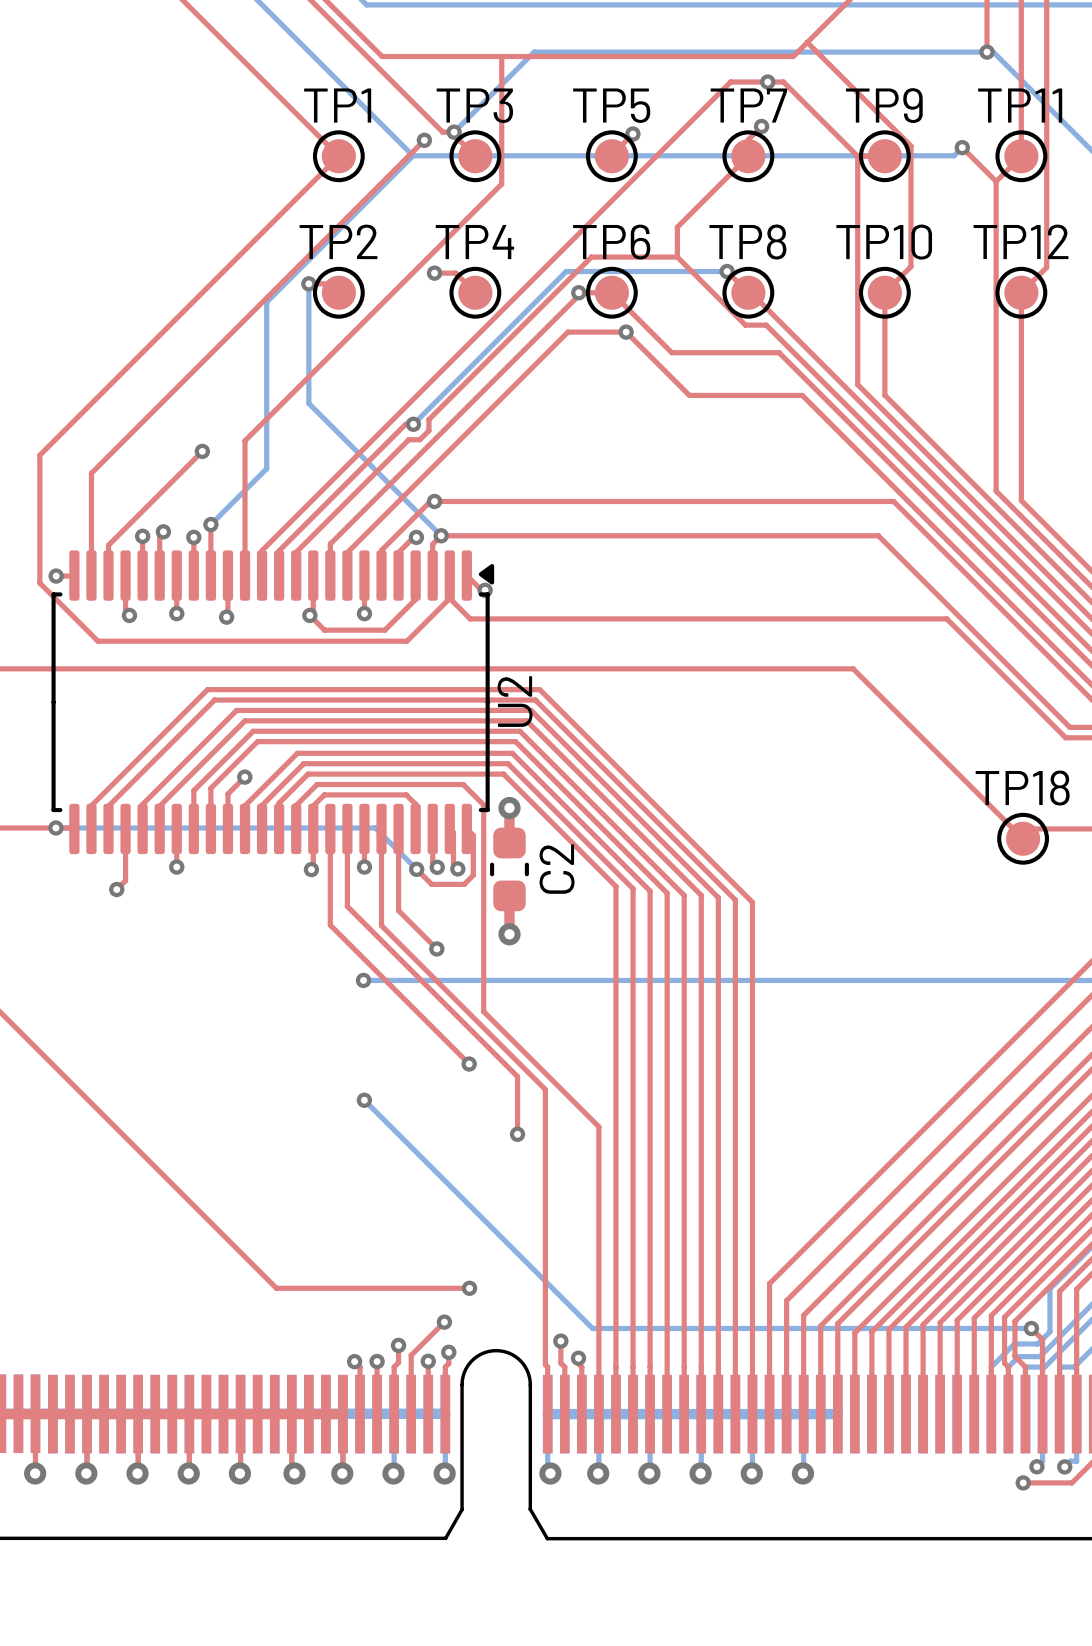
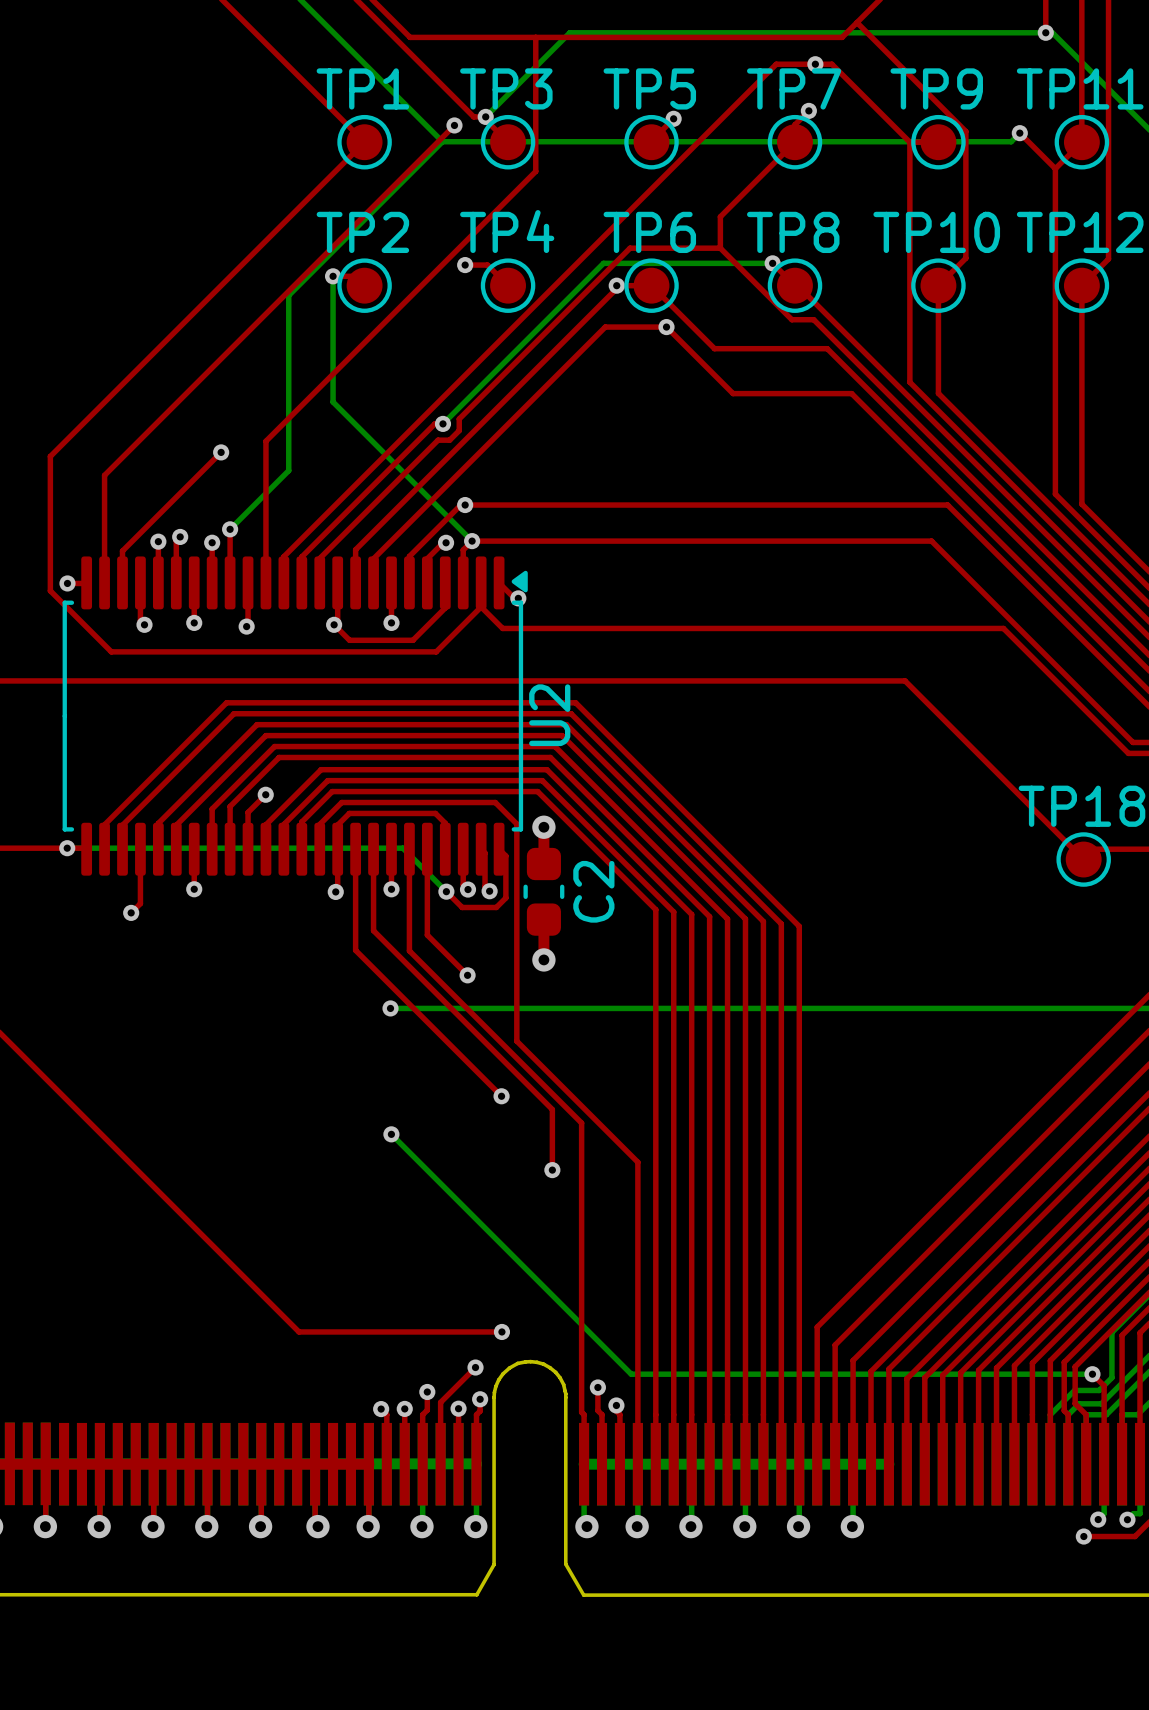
board edge: (462, 1384) (465, 1368) (473, 1359) (484, 1352) (496, 1350) (512, 1354) (521, 1362) (528, 1372) (530, 1385) -> (494, 1433) (494, 1392) (498, 1379) (509, 1368) (517, 1363) (530, 1361) (550, 1367) (555, 1372) (563, 1384) (565, 1393) (565, 1433)

